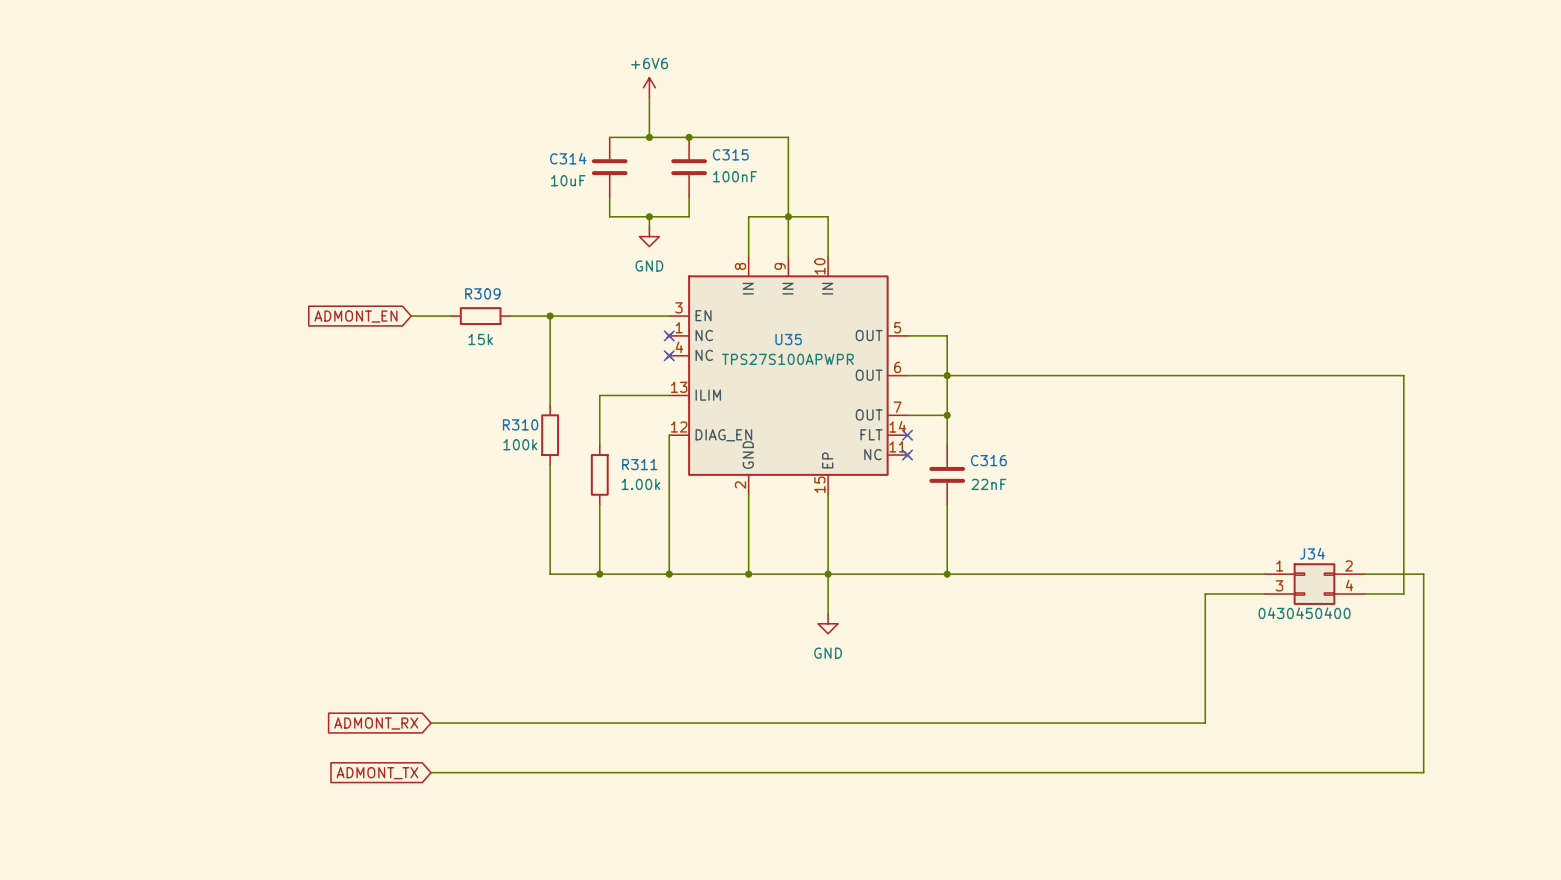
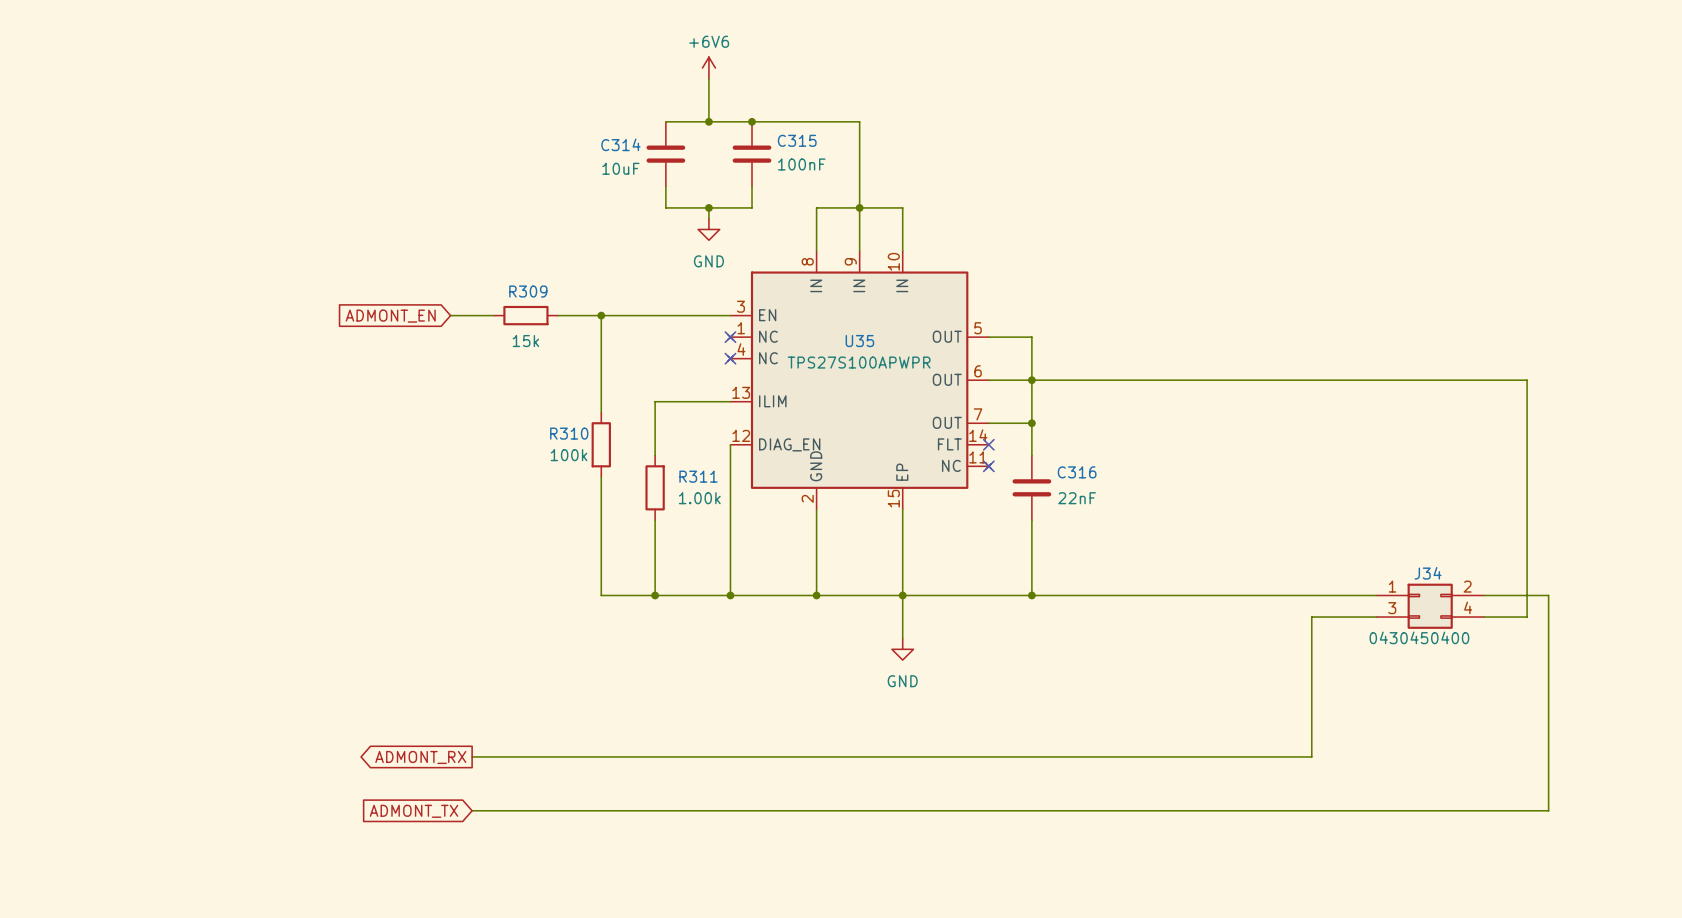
global label shape: input (376, 723) -> output (420, 757)

